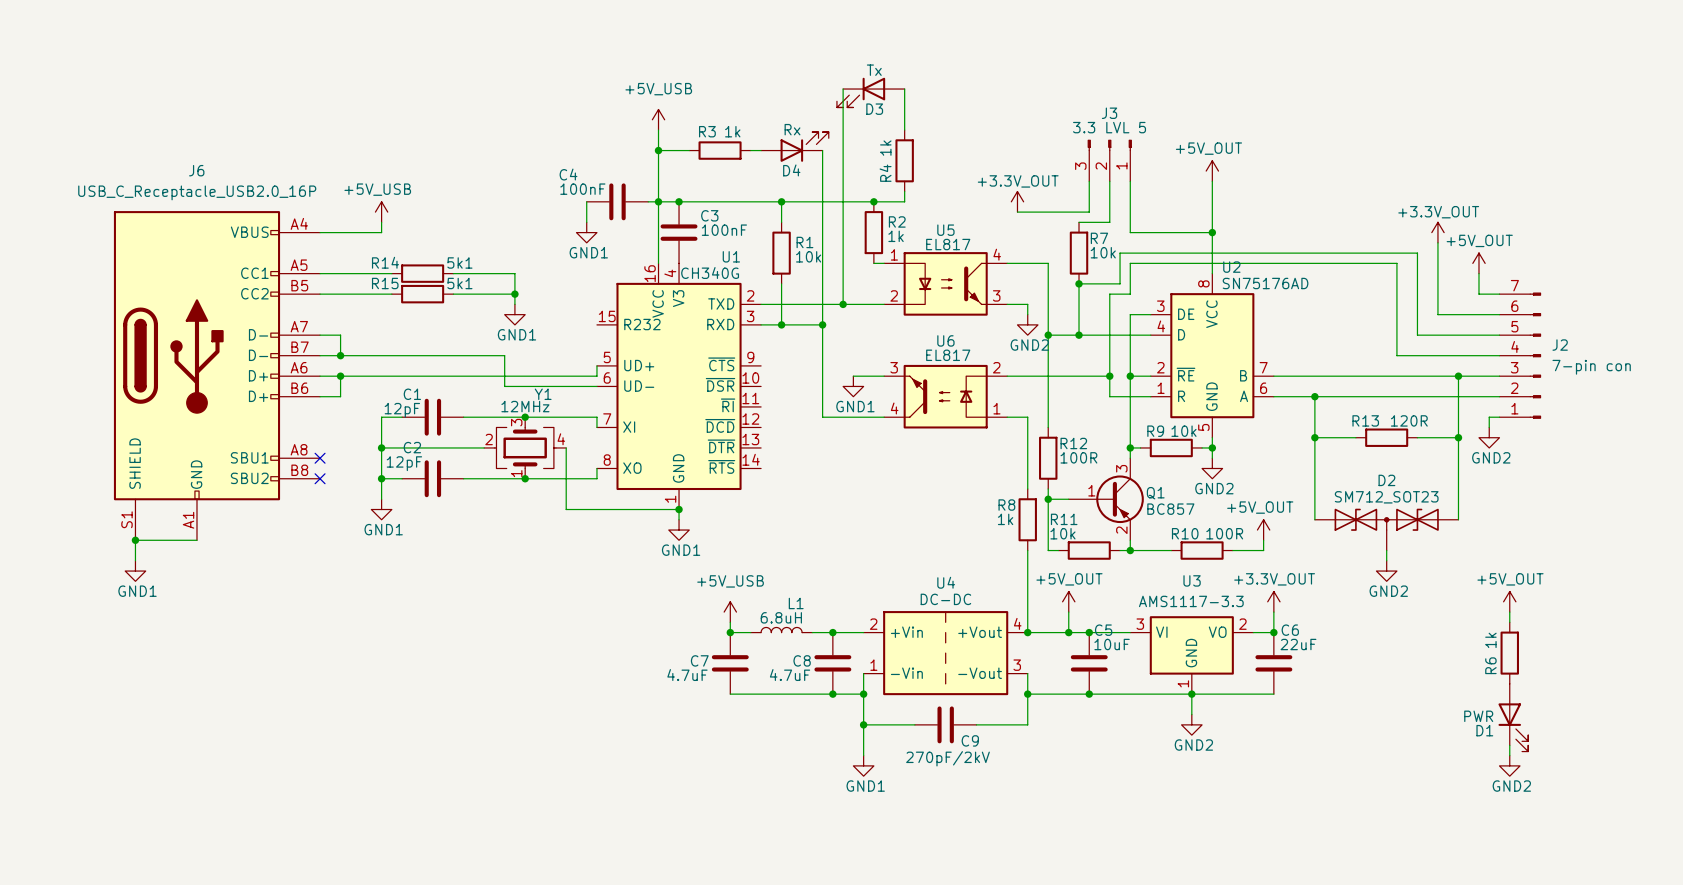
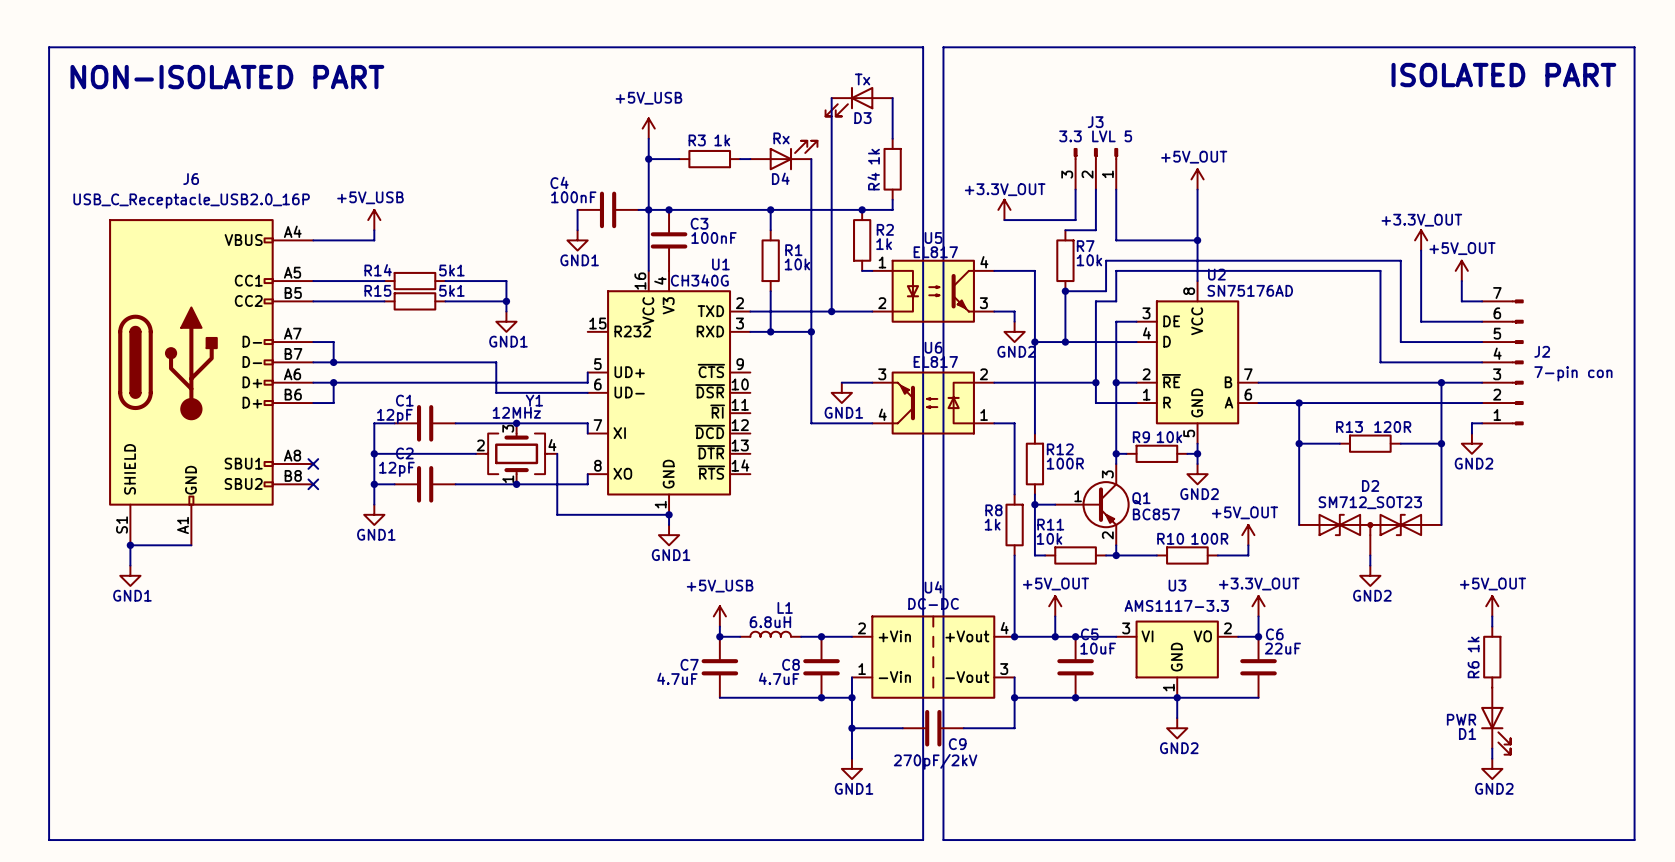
line: none -> (49, 47) (923, 47) (923, 840) (49, 840) (49, 47)
line: none -> (943, 47) (1634, 47) (1634, 840) (943, 840) (943, 47)
text: none -> ISOLATED PART (1503, 75)
text: none -> NON-ISOLATED PART (227, 77)

